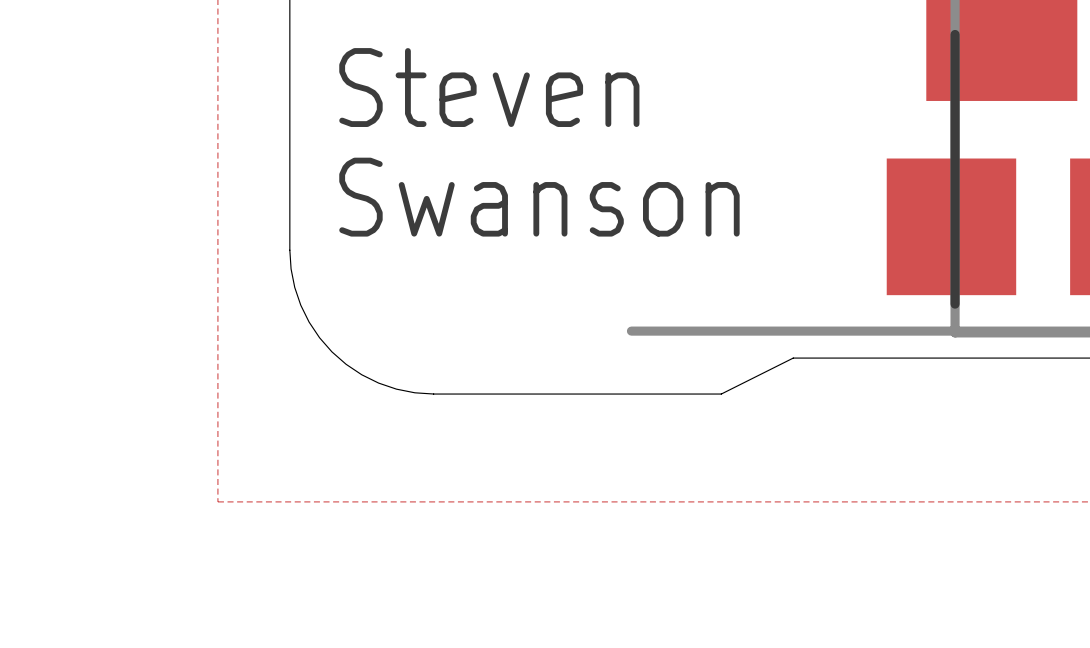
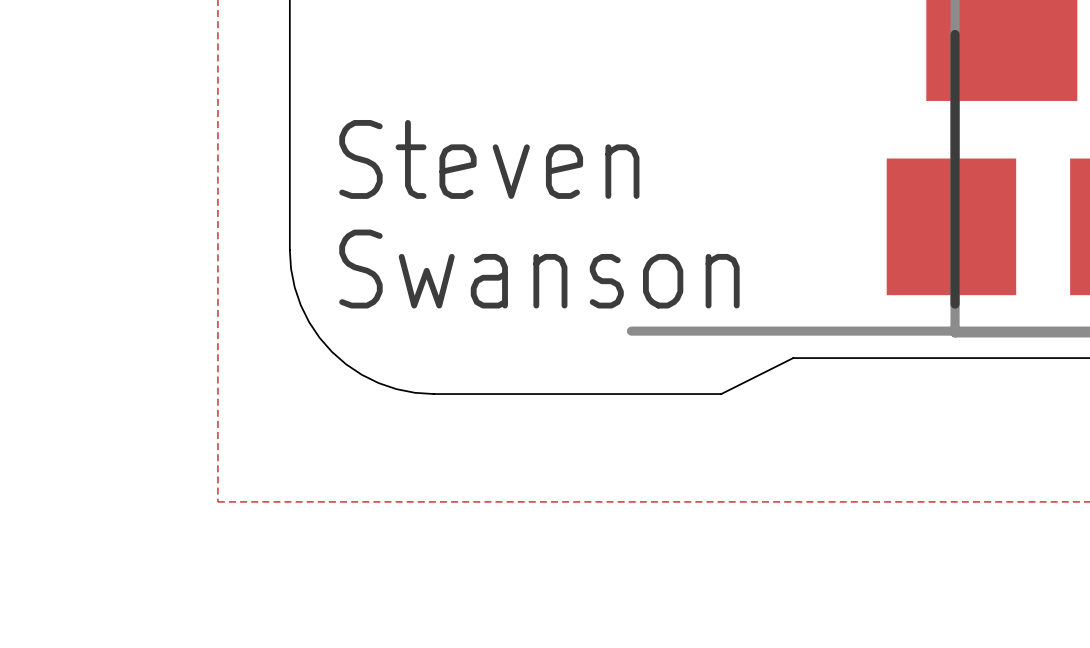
text position: Steven (489, 87) -> Steven (489, 159)
text position: Swanson (539, 197) -> Swanson (539, 269)

